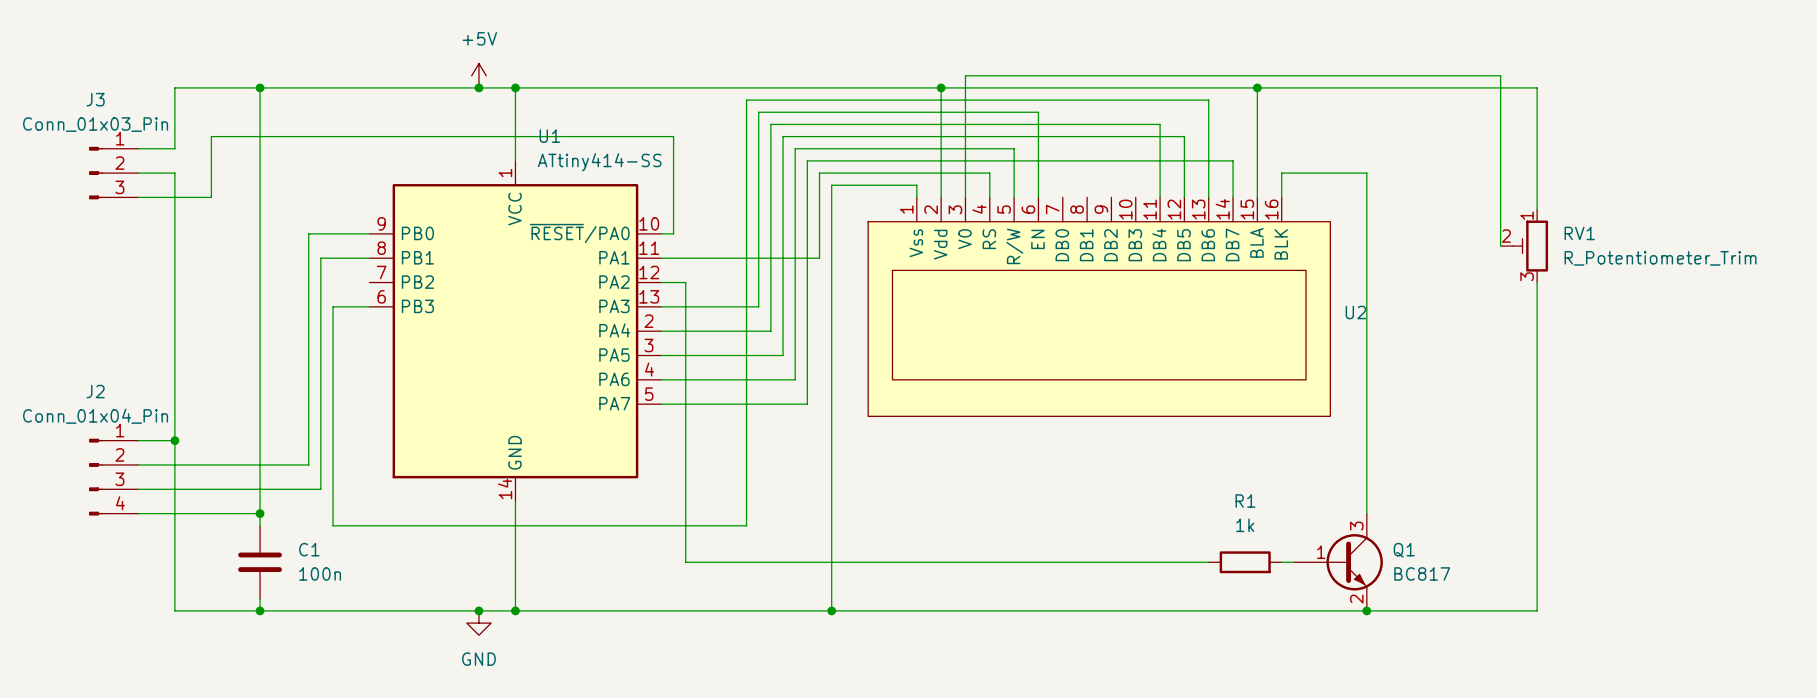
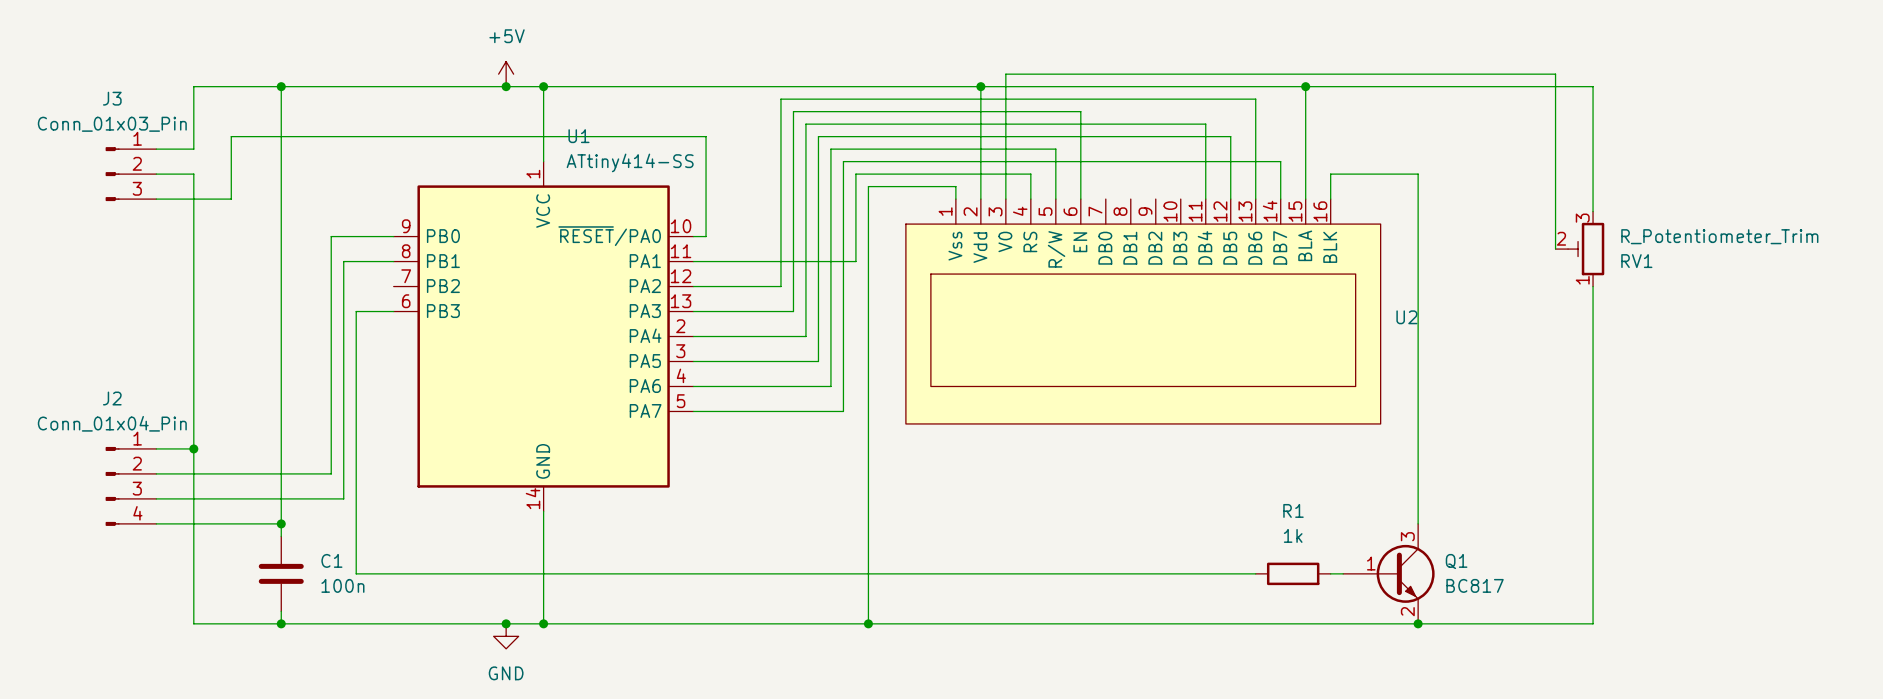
RV1 flip: as is (1530, 246) -> up-down (1586, 249)
wire: (685, 282) (685, 562) -> (718, 286) (780, 286)
wire: (746, 282) (746, 525) (333, 525) -> (718, 573) (356, 573) (356, 536)

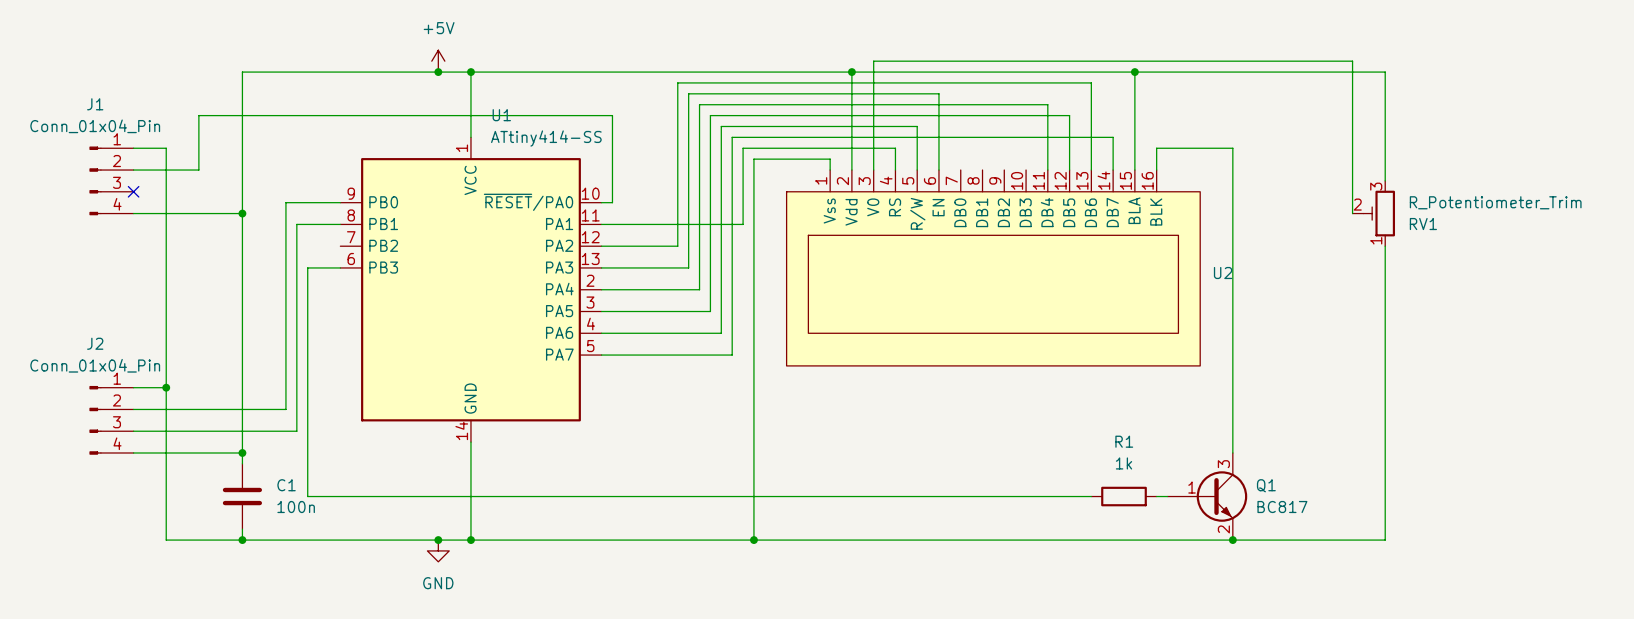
wire: (281, 86) (193, 86) (193, 149) (156, 149) -> none
junction: (281, 86) -> none
J3: Conn_01x03_Pin (130, 174) -> none
J1: none -> Conn_01x04_Pin (111, 180)
no-connect mark: none -> (133, 191)
wire: none -> (133, 213) (242, 213)
junction: none -> (242, 213)

